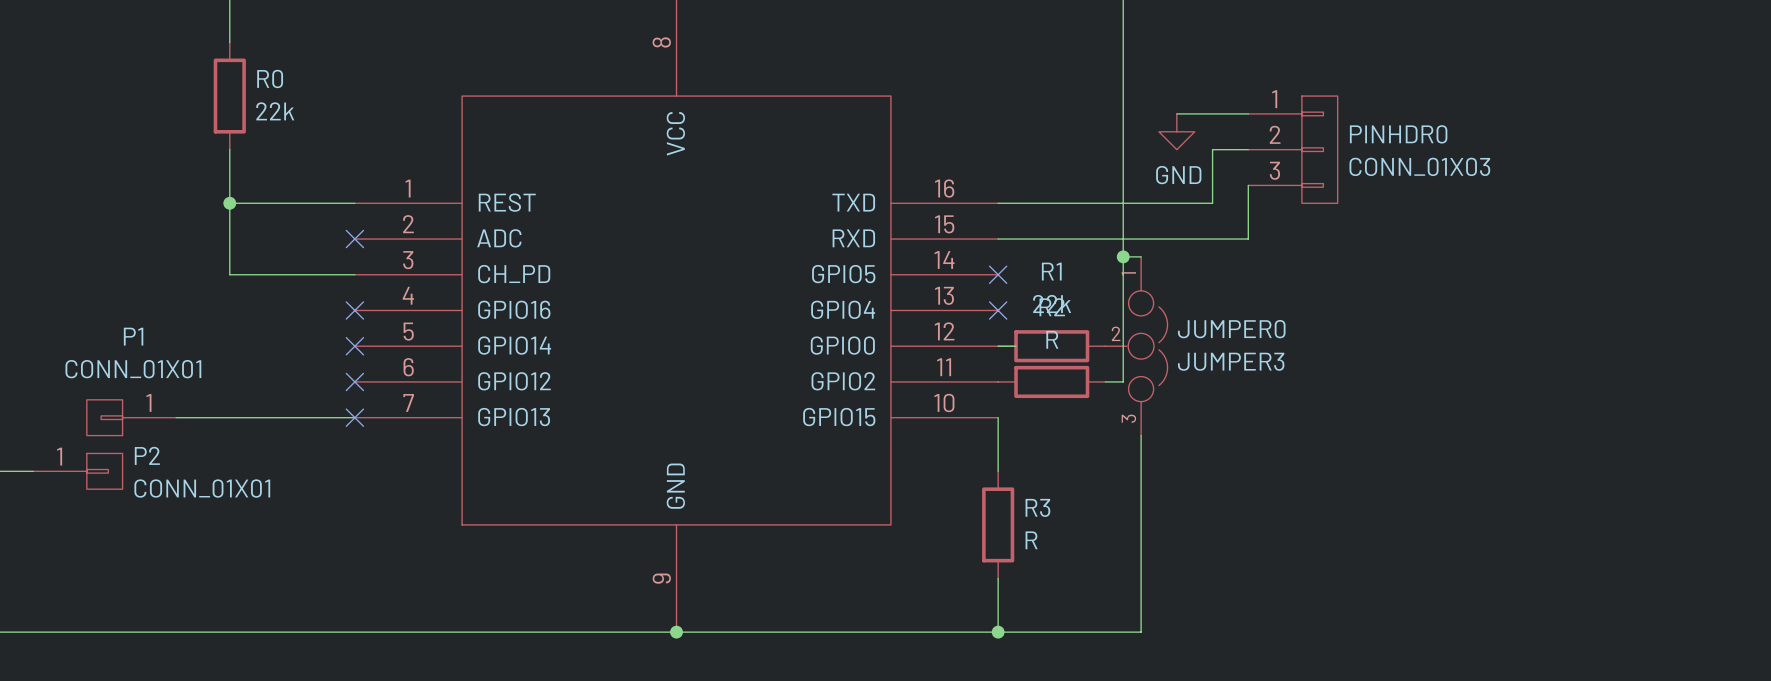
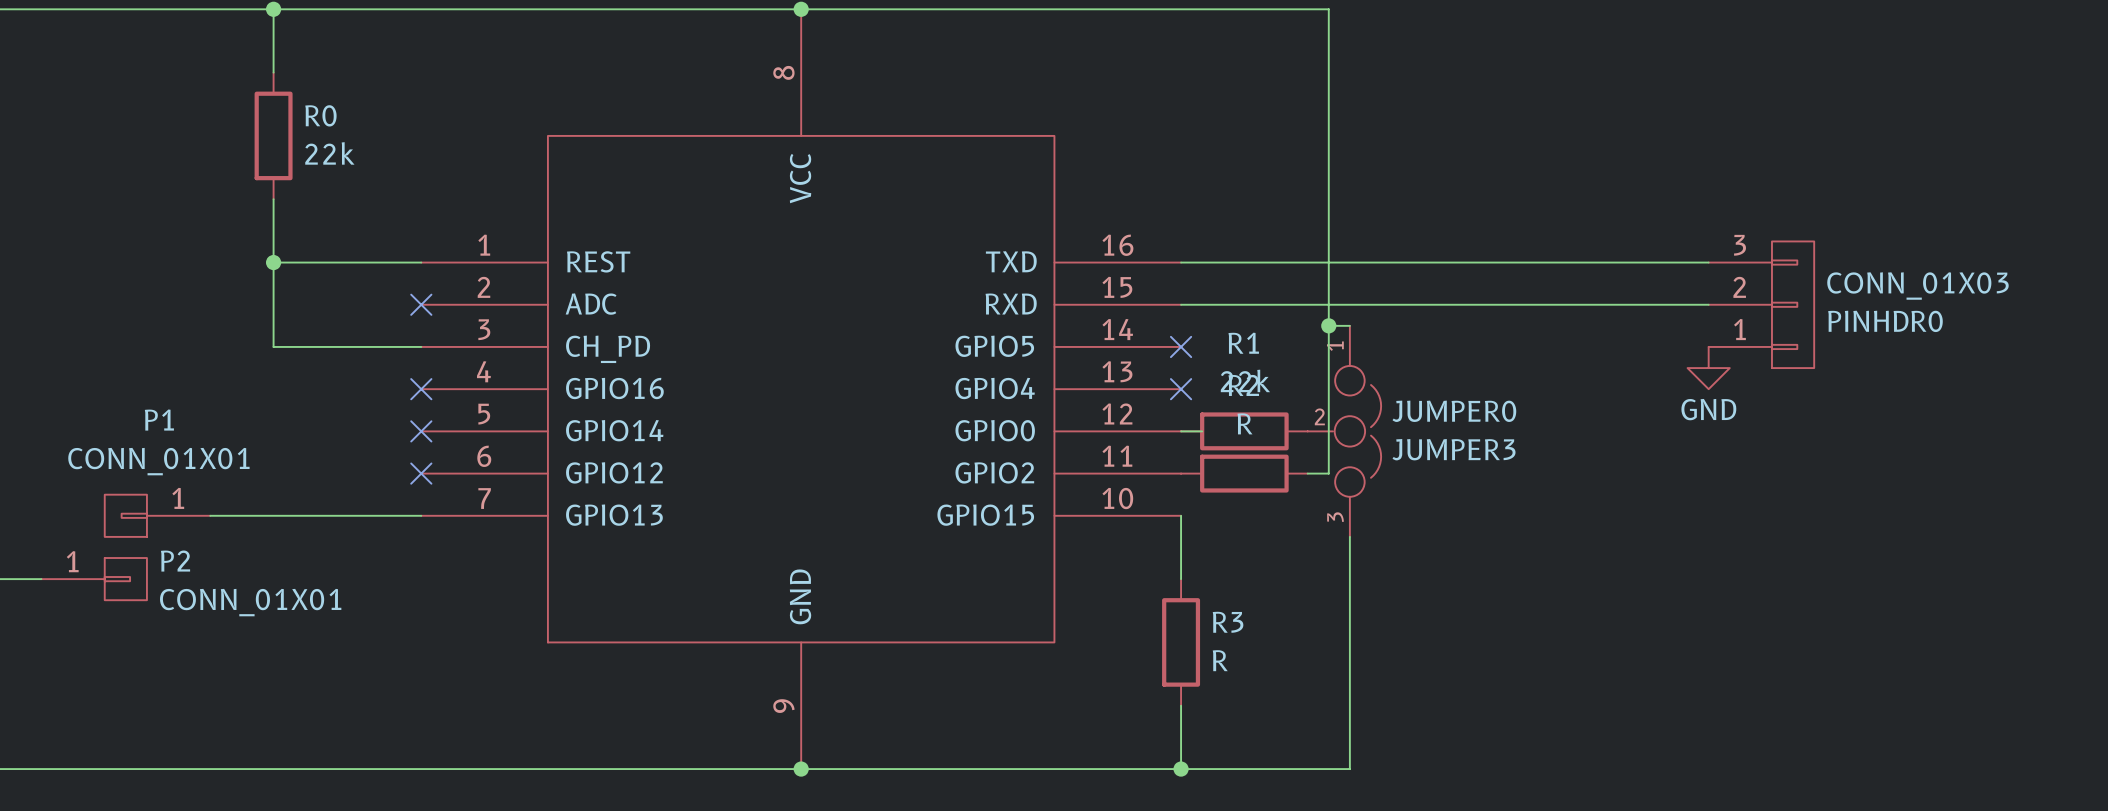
wire: (1176, 113) (1248, 113) -> none
power symbol position: GND (1176, 131) -> GND (1708, 368)
wire: (1248, 149) (1212, 149) (1212, 203) -> (1708, 262) (1434, 262)
PINHDR0 position: (1292, 149) -> (1761, 304)
PINHDR0 flip: as is (1319, 149) -> up-down (1793, 304)
power symbol text position: GND (1178, 175) -> GND (1708, 409)
wire: (1248, 185) (1248, 239) -> (1708, 304) (1476, 304)
no-connect mark: (354, 417) -> none

